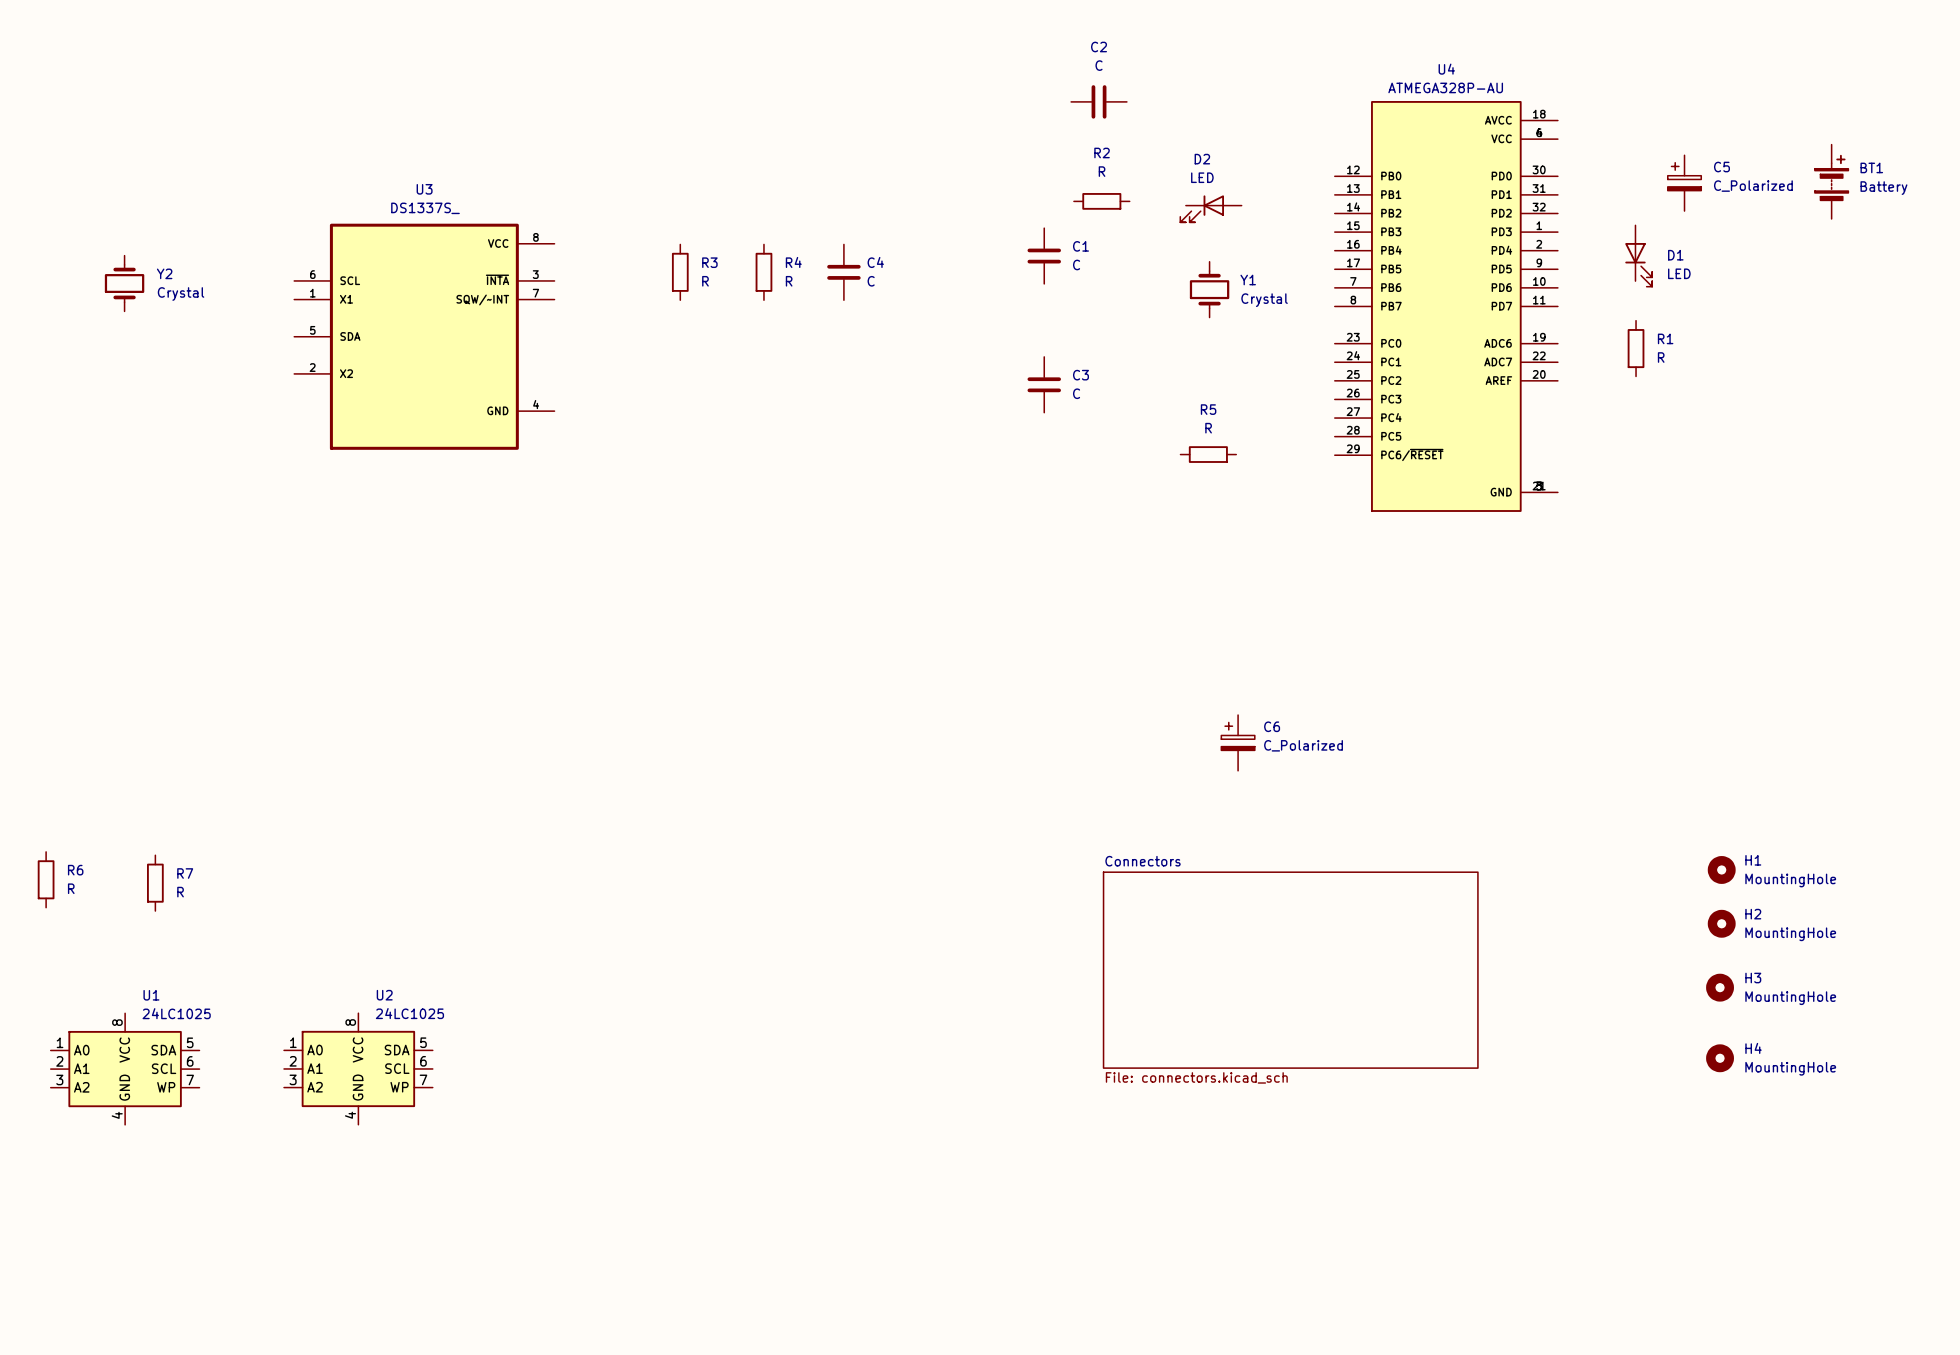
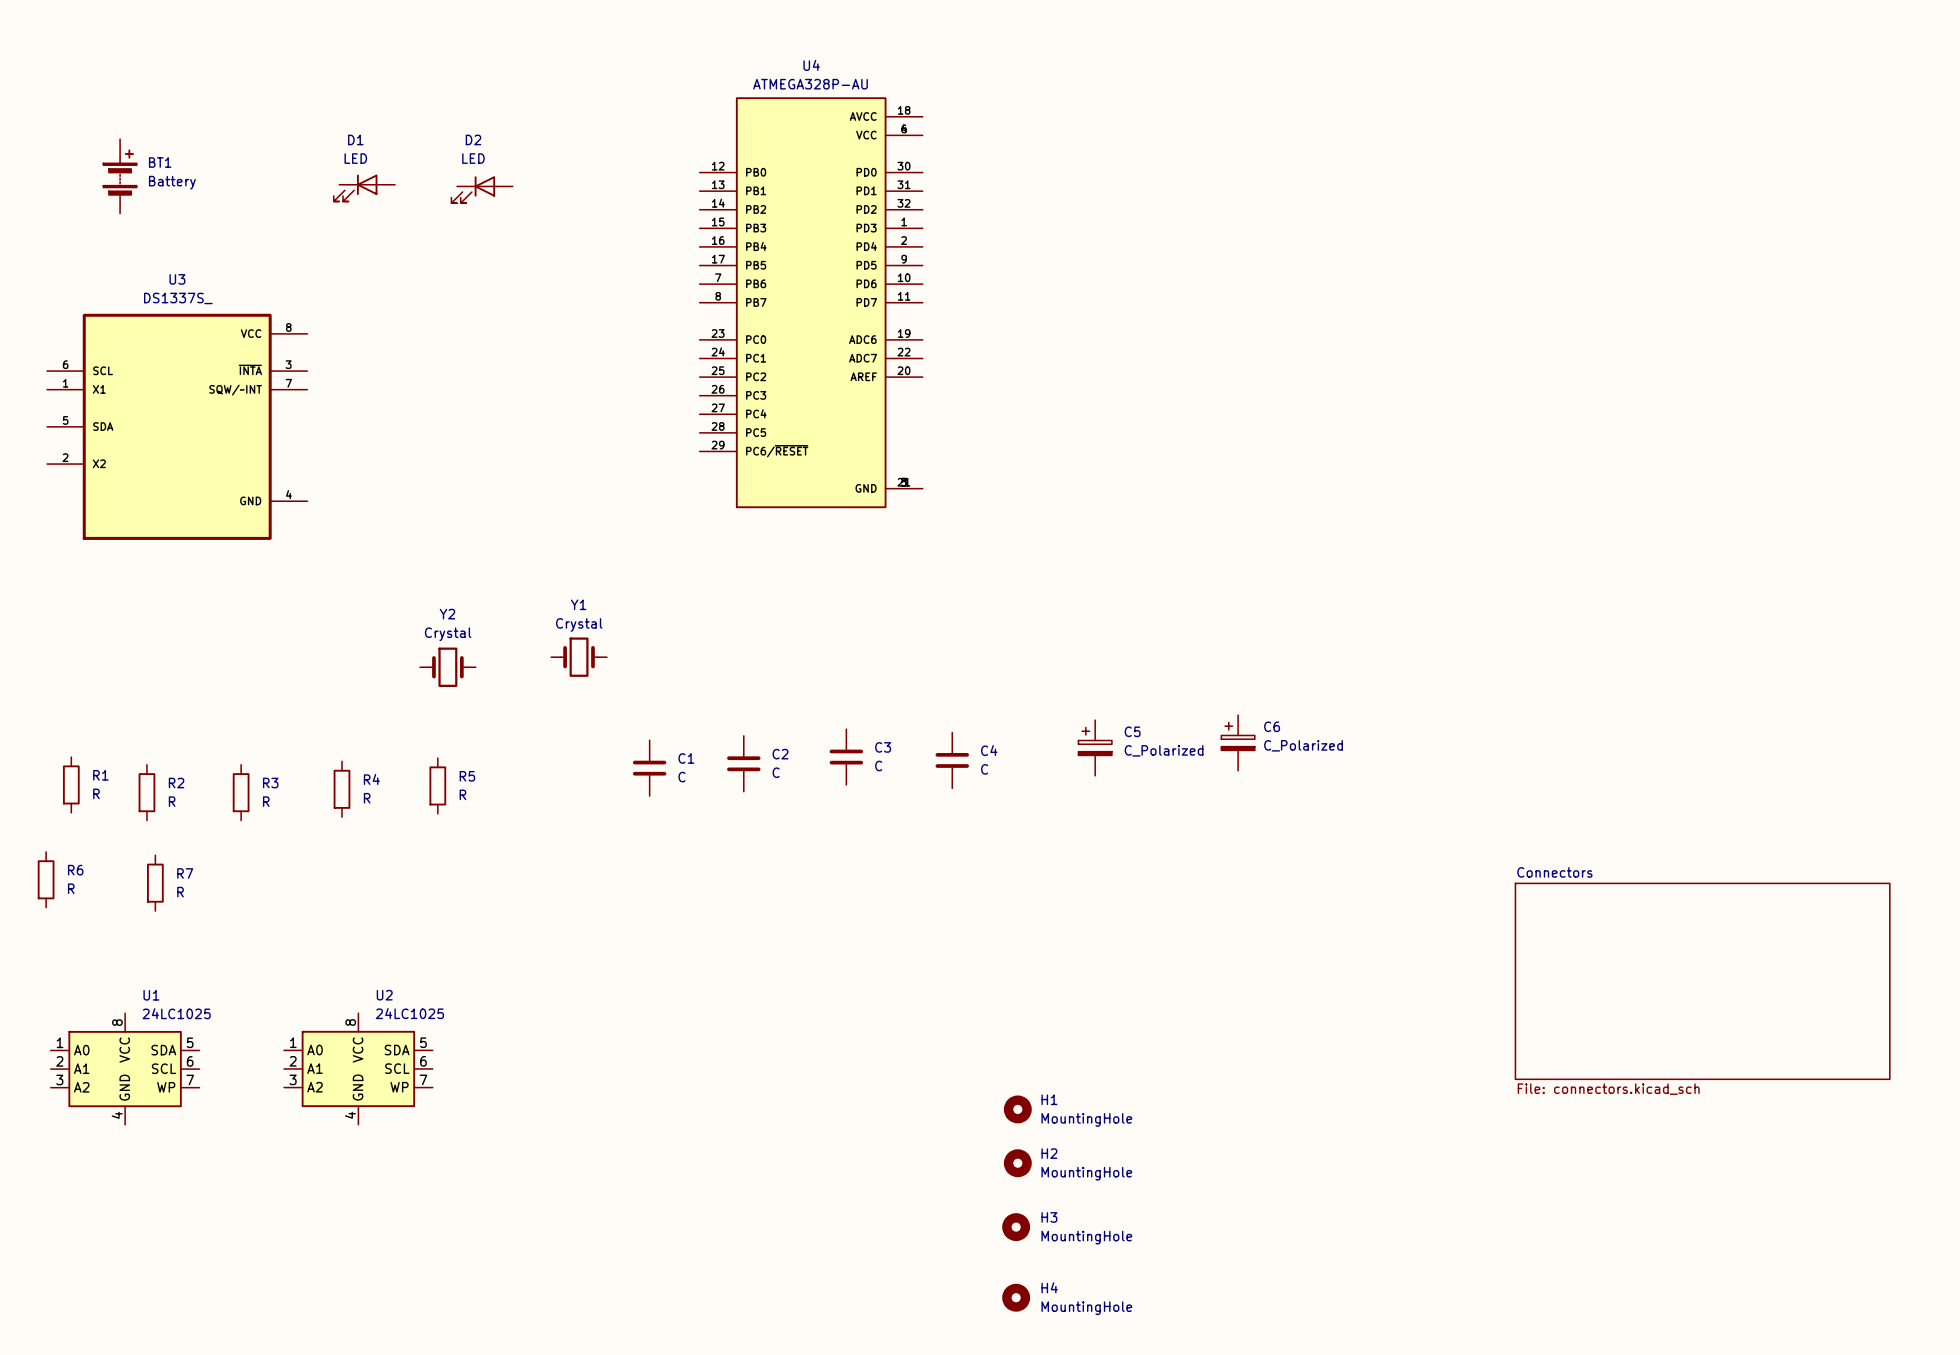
C2 name position: C2 (1099, 47) -> C2 (780, 754)
C2 rotation: 0° (1099, 101) -> 90° clockwise (743, 763)
C2 position: (1099, 101) -> (743, 763)
R2 name position: R2 (1102, 152) -> R2 (176, 783)
BT1 position: (1831, 181) -> (120, 176)
C5 position: (1684, 183) -> (1095, 747)
R2 rotation: 0° (1101, 201) -> 90° clockwise (146, 792)
R2 position: (1101, 201) -> (146, 792)
D2 position: (1210, 208) -> (482, 189)
D1 name position: D1 (1675, 255) -> D1 (355, 139)
C1 position: (1044, 256) -> (649, 768)
D1 position: (1638, 256) -> (364, 188)
C4 name position: C4 (875, 262) -> C4 (989, 750)
D1 rotation: 0° (1638, 264) -> 90° clockwise (355, 188)
R3 position: (680, 272) -> (241, 792)
R4 position: (763, 272) -> (341, 789)
C4 position: (843, 272) -> (952, 760)
Y2 name position: Y2 (164, 273) -> Y2 (447, 614)
D1 value position: LED (1679, 273) -> LED (355, 158)
Y1 name position: Y1 (1248, 280) -> Y1 (578, 604)
C4 value position: C (871, 281) -> C (984, 769)
Y2 rotation: 0° (124, 283) -> 90° clockwise (447, 667)
Y2 position: (124, 283) -> (447, 667)
Y1 rotation: 0° (1209, 289) -> 90° clockwise (579, 657)
Y1 position: (1209, 289) -> (579, 657)
Y2 value position: Crystal (181, 294) -> Crystal (448, 634)
Y1 value position: Crystal (1264, 300) -> Crystal (579, 624)
U4 position: (1446, 306) -> (811, 302)
U3 position: (424, 336) -> (177, 426)
R1 position: (1636, 348) -> (71, 784)
C3 position: (1044, 384) -> (846, 757)
R5 name position: R5 (1208, 409) -> R5 (467, 776)
R5 rotation: 0° (1208, 454) -> 90° clockwise (437, 785)
R5 position: (1208, 454) -> (437, 785)
H1 position: (1721, 869) -> (1017, 1109)
H2 position: (1721, 923) -> (1017, 1163)
sheet Connectors: File: connectors.kicad_sch (1290, 970) -> none
sheet Connectors: none -> File: connectors.kicad_sch (1702, 981)
H3 position: (1720, 987) -> (1016, 1227)
H4 position: (1720, 1058) -> (1016, 1297)

